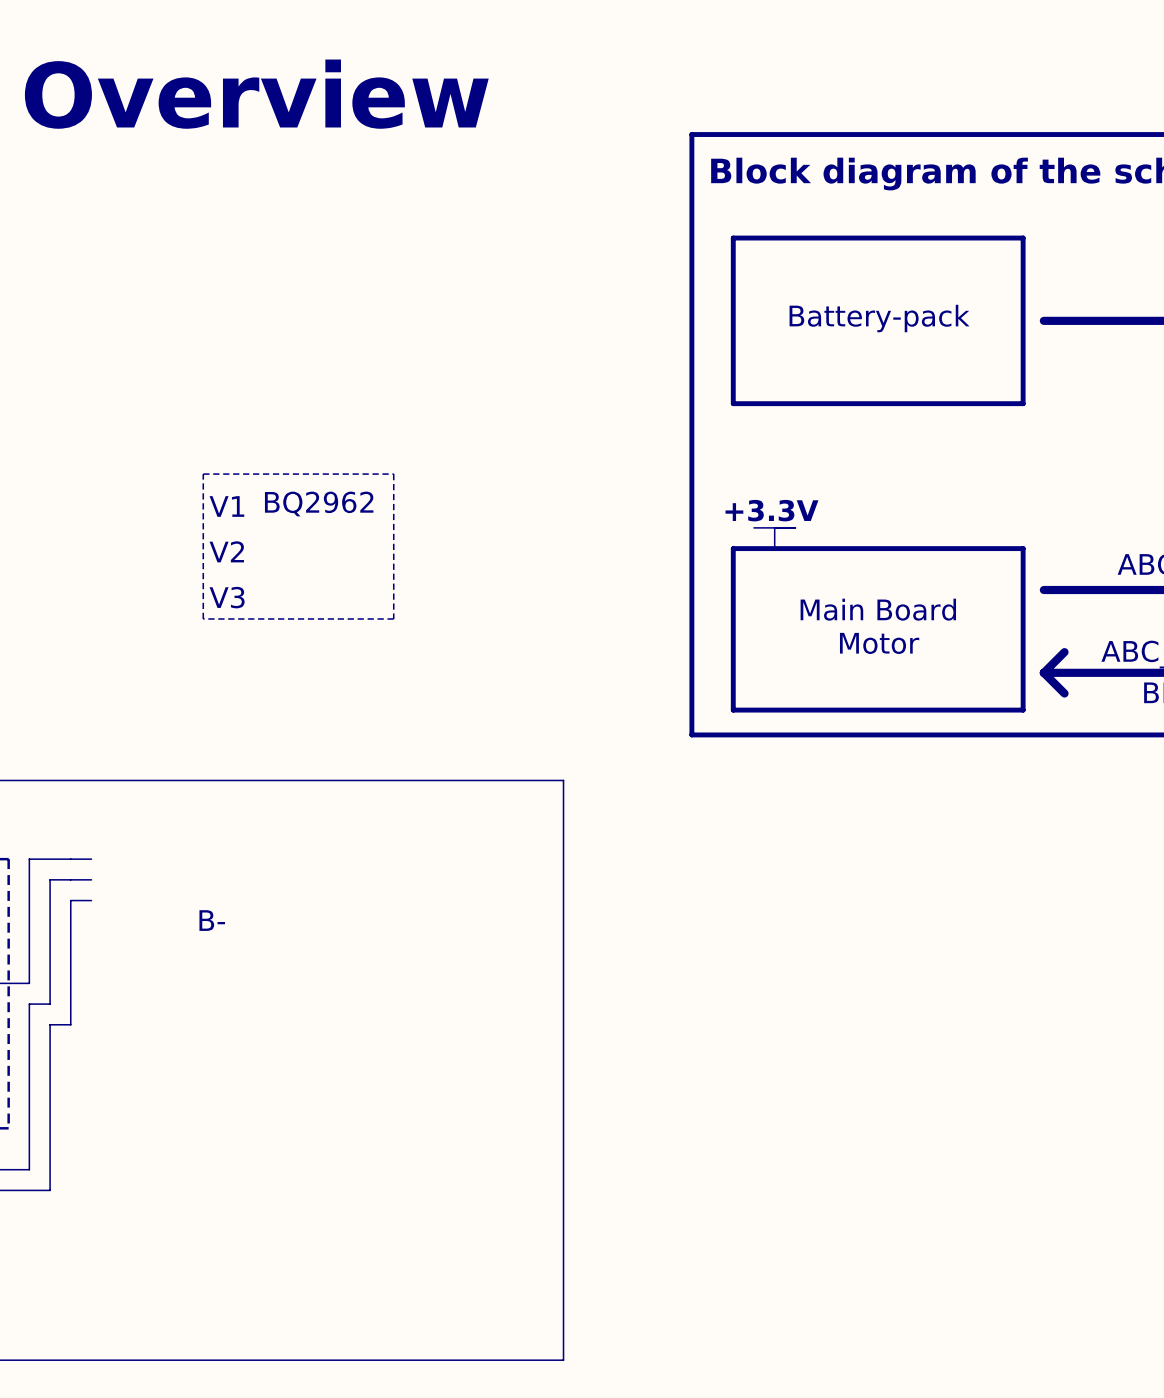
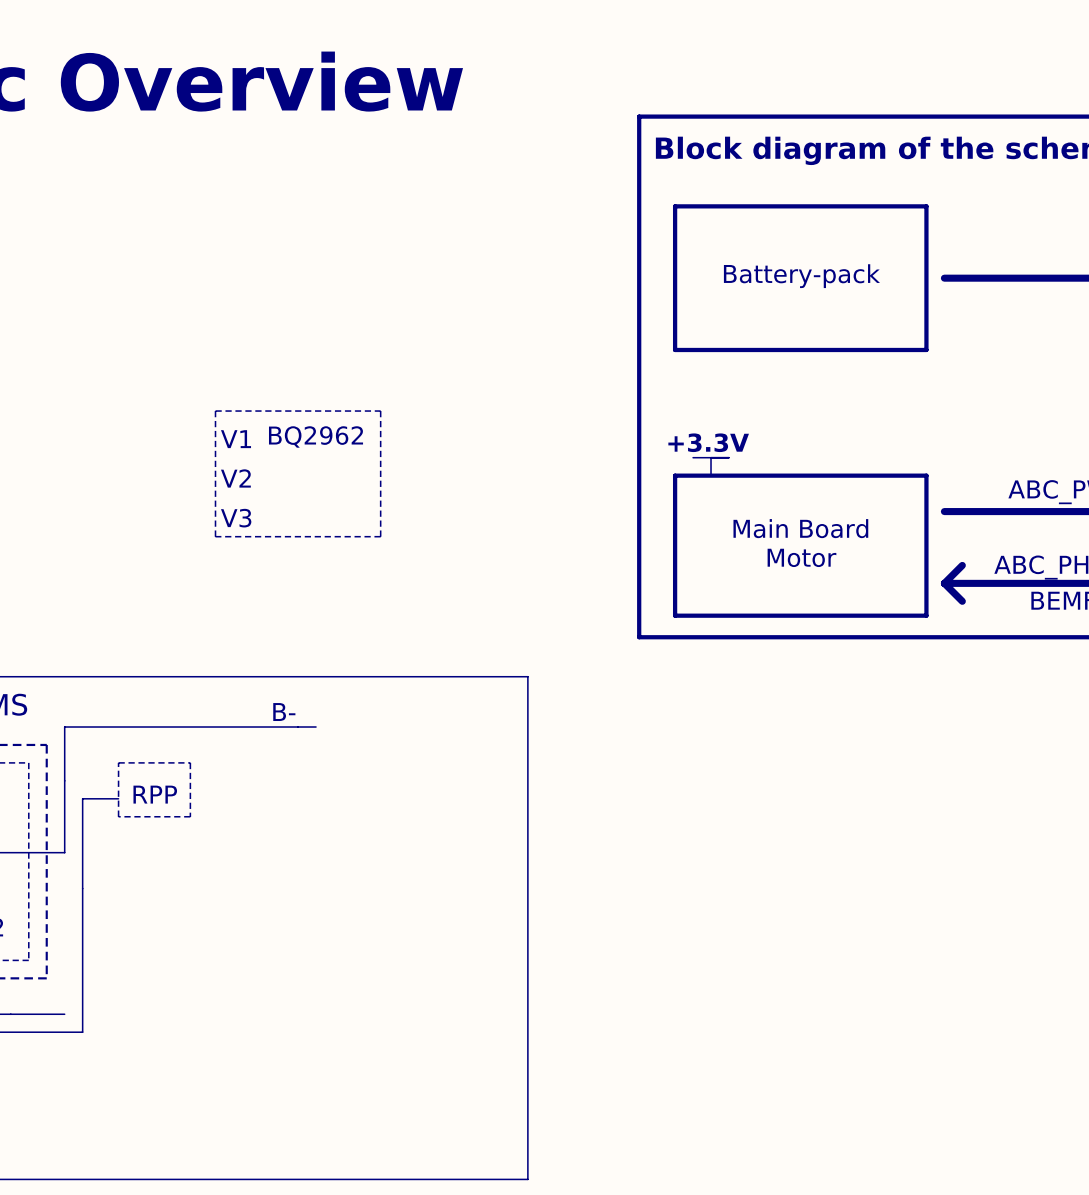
line: (29, 859) (91, 859) -> (64, 744) (64, 727) (316, 727)
line: (91, 879) (50, 879) (50, 921) -> (118, 798) (82, 798)
line: none -> (118, 762) (190, 762) (190, 816) (118, 816) (118, 762)
line: (91, 900) (70, 900) (70, 1024) (50, 1024) -> (82, 870) (82, 888)
text: none -> RPP (155, 794)
text position: B- (212, 920) -> B- (284, 712)
line: (50, 1004) (29, 1004) (29, 1169) -> none

